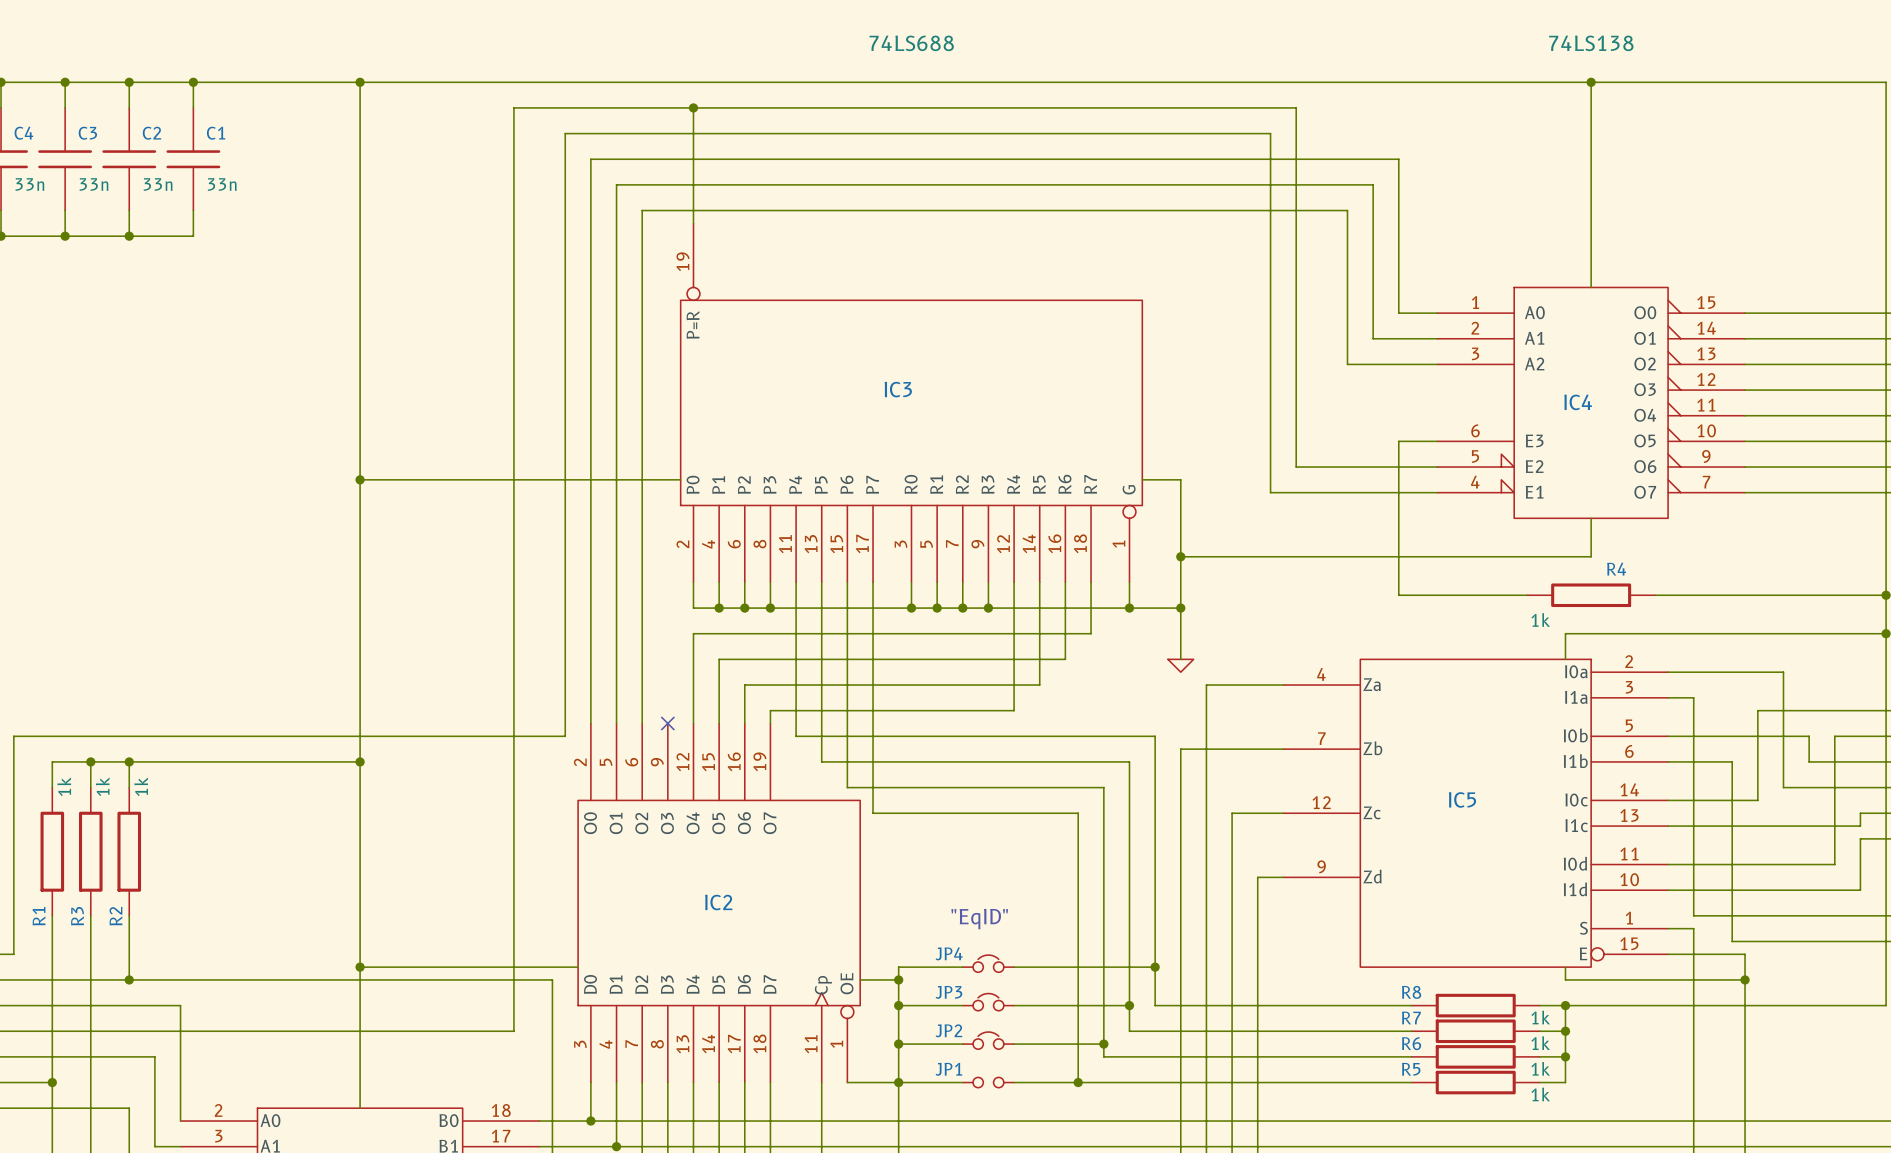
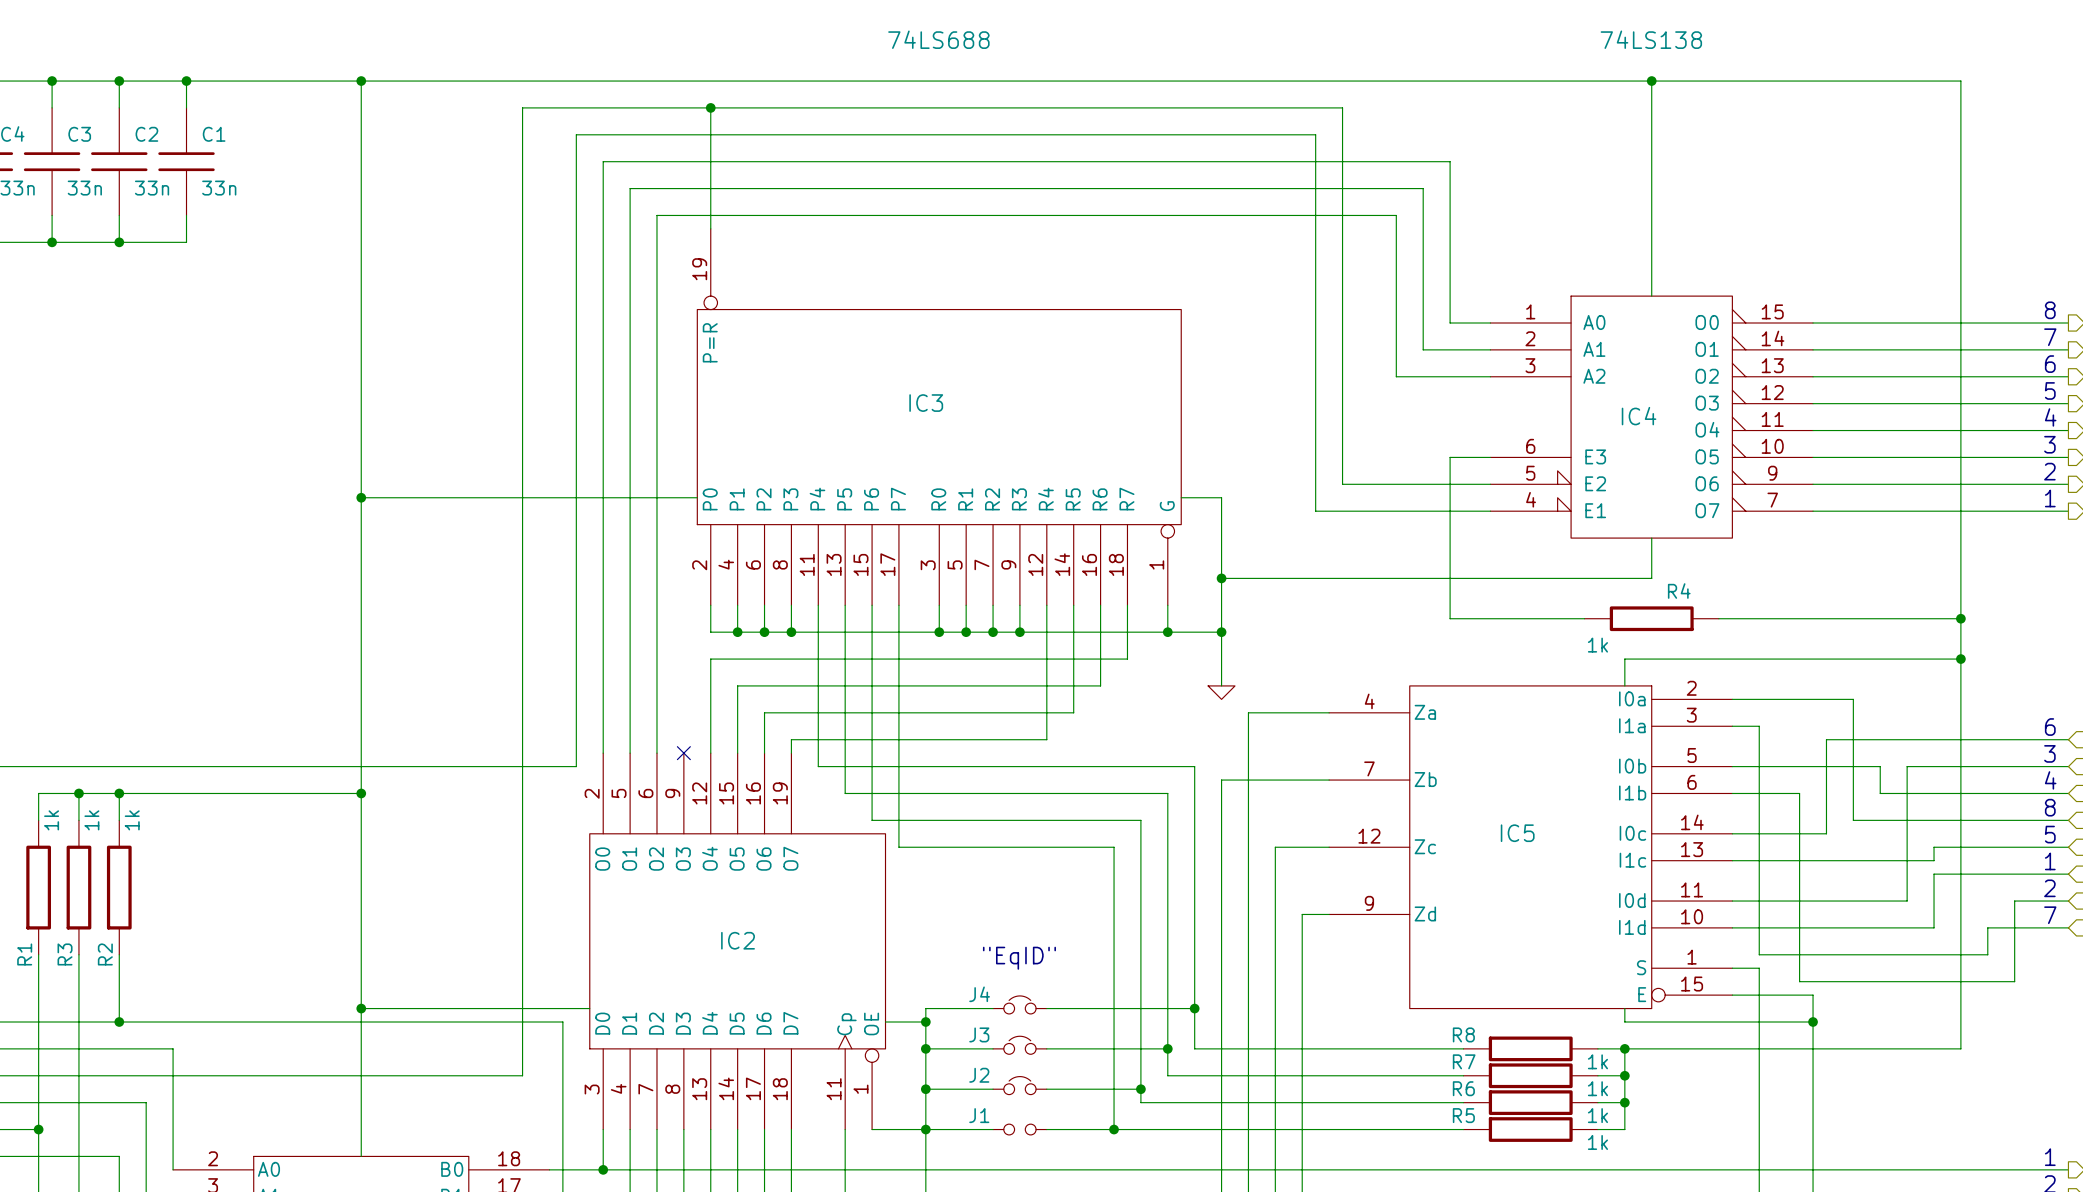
JP4 name: JP4 (949, 953) -> J4 (979, 994)
JP3 name: JP3 (948, 992) -> J3 (979, 1034)
JP2 name: JP2 (948, 1030) -> J2 (979, 1075)
JP1 name: JP1 (948, 1069) -> J1 (979, 1115)

